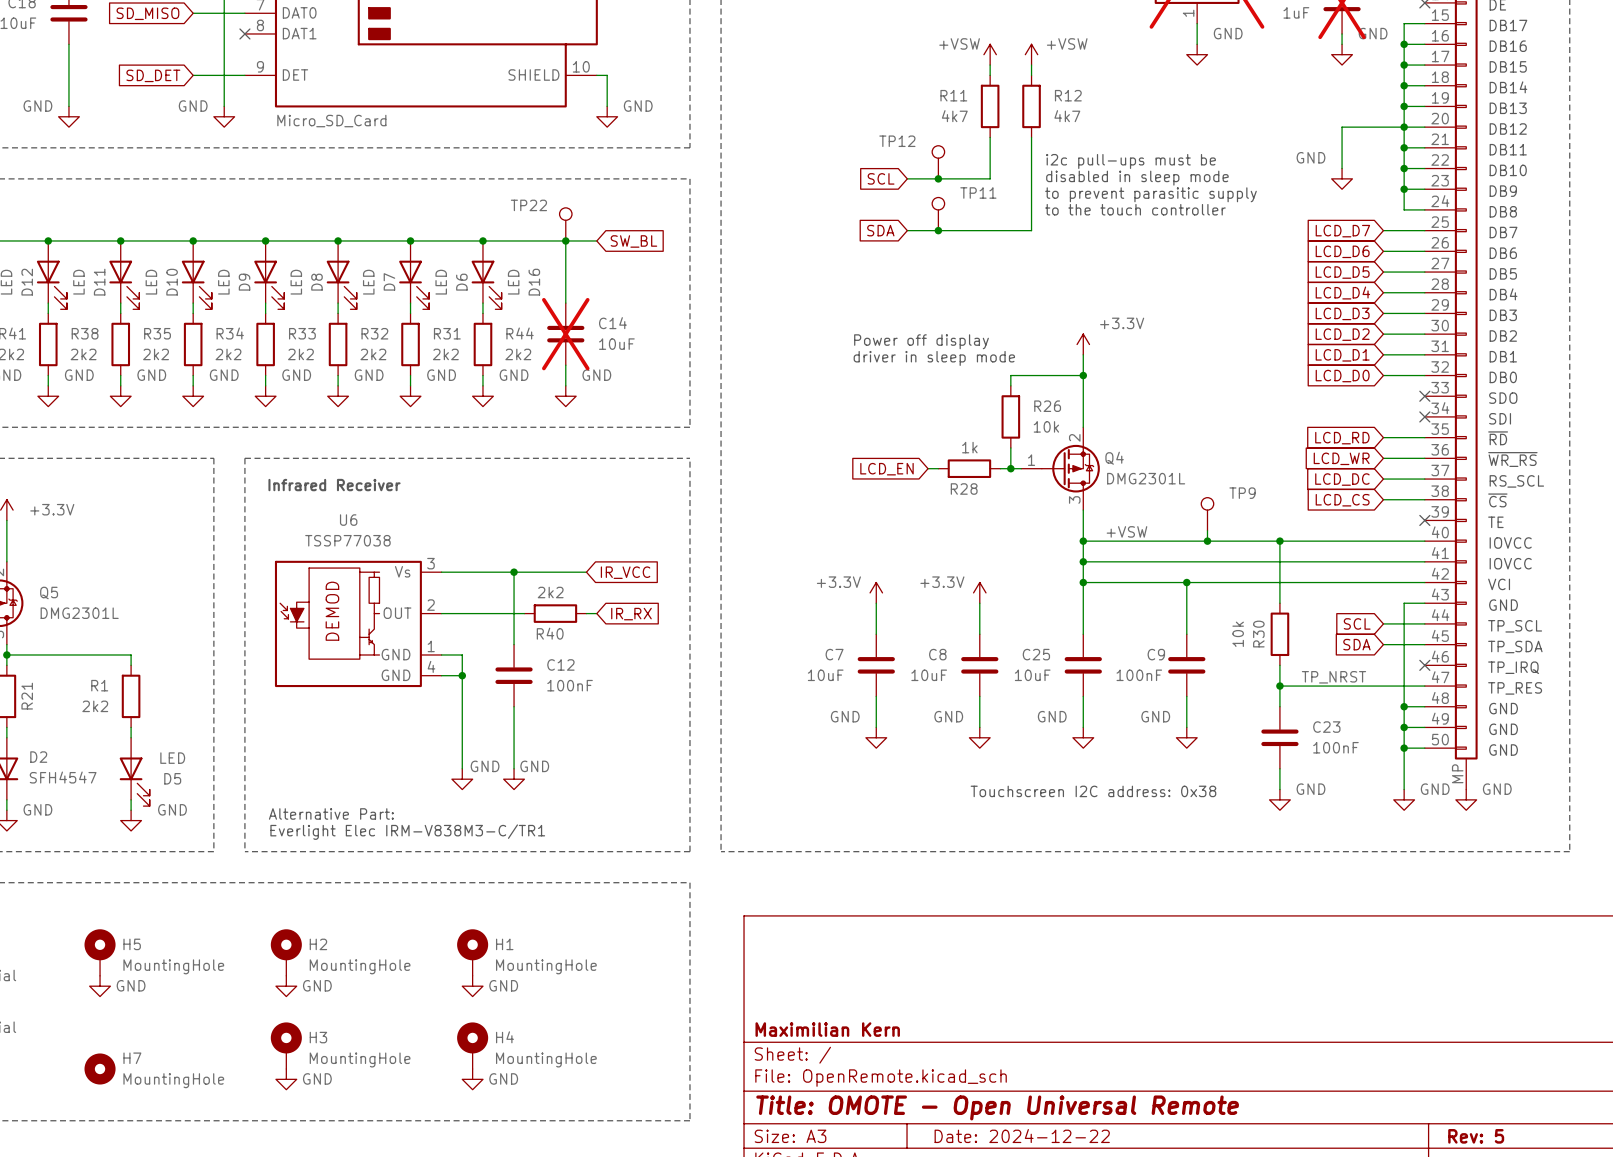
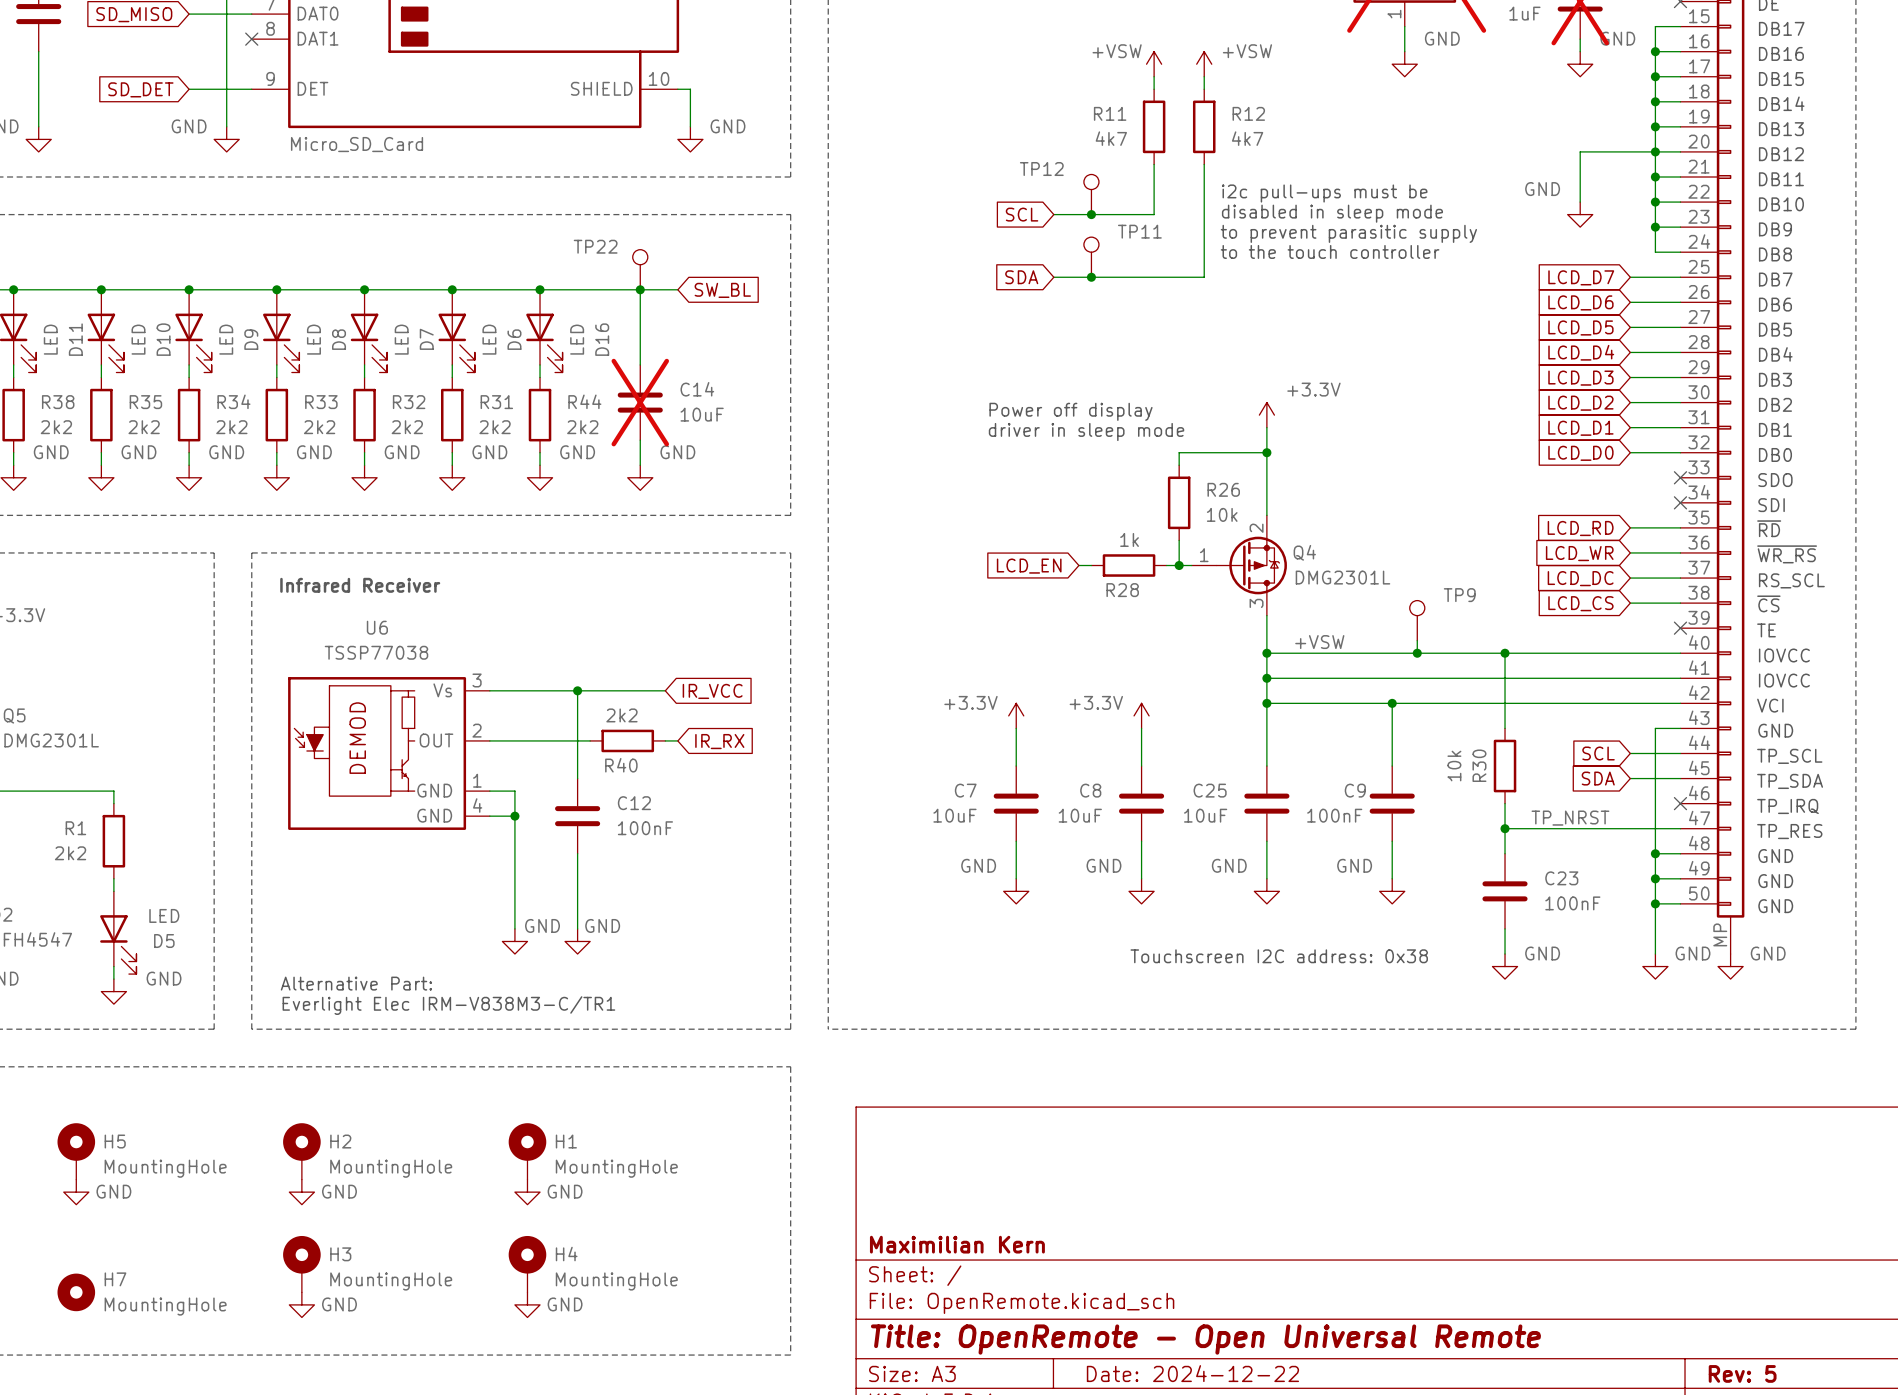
title block: Title: OMOTE - Open Universal Remote (997, 1107) -> Title: OpenRemote - Open Universal Remote (1205, 1339)

